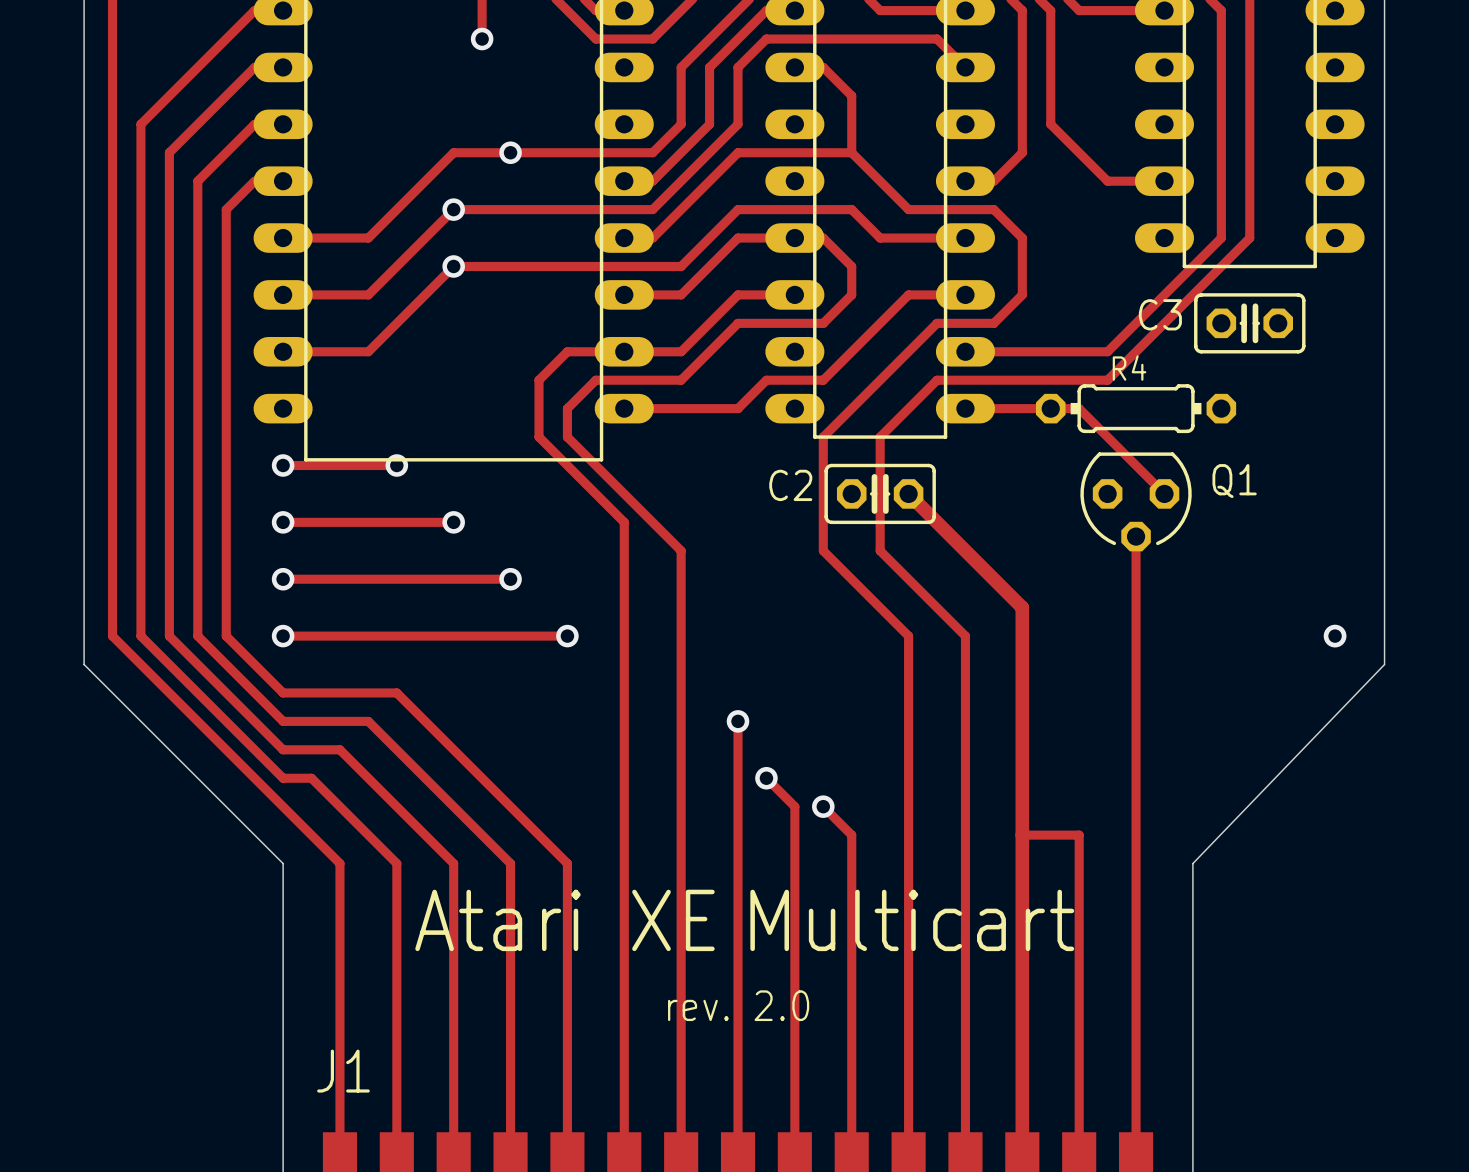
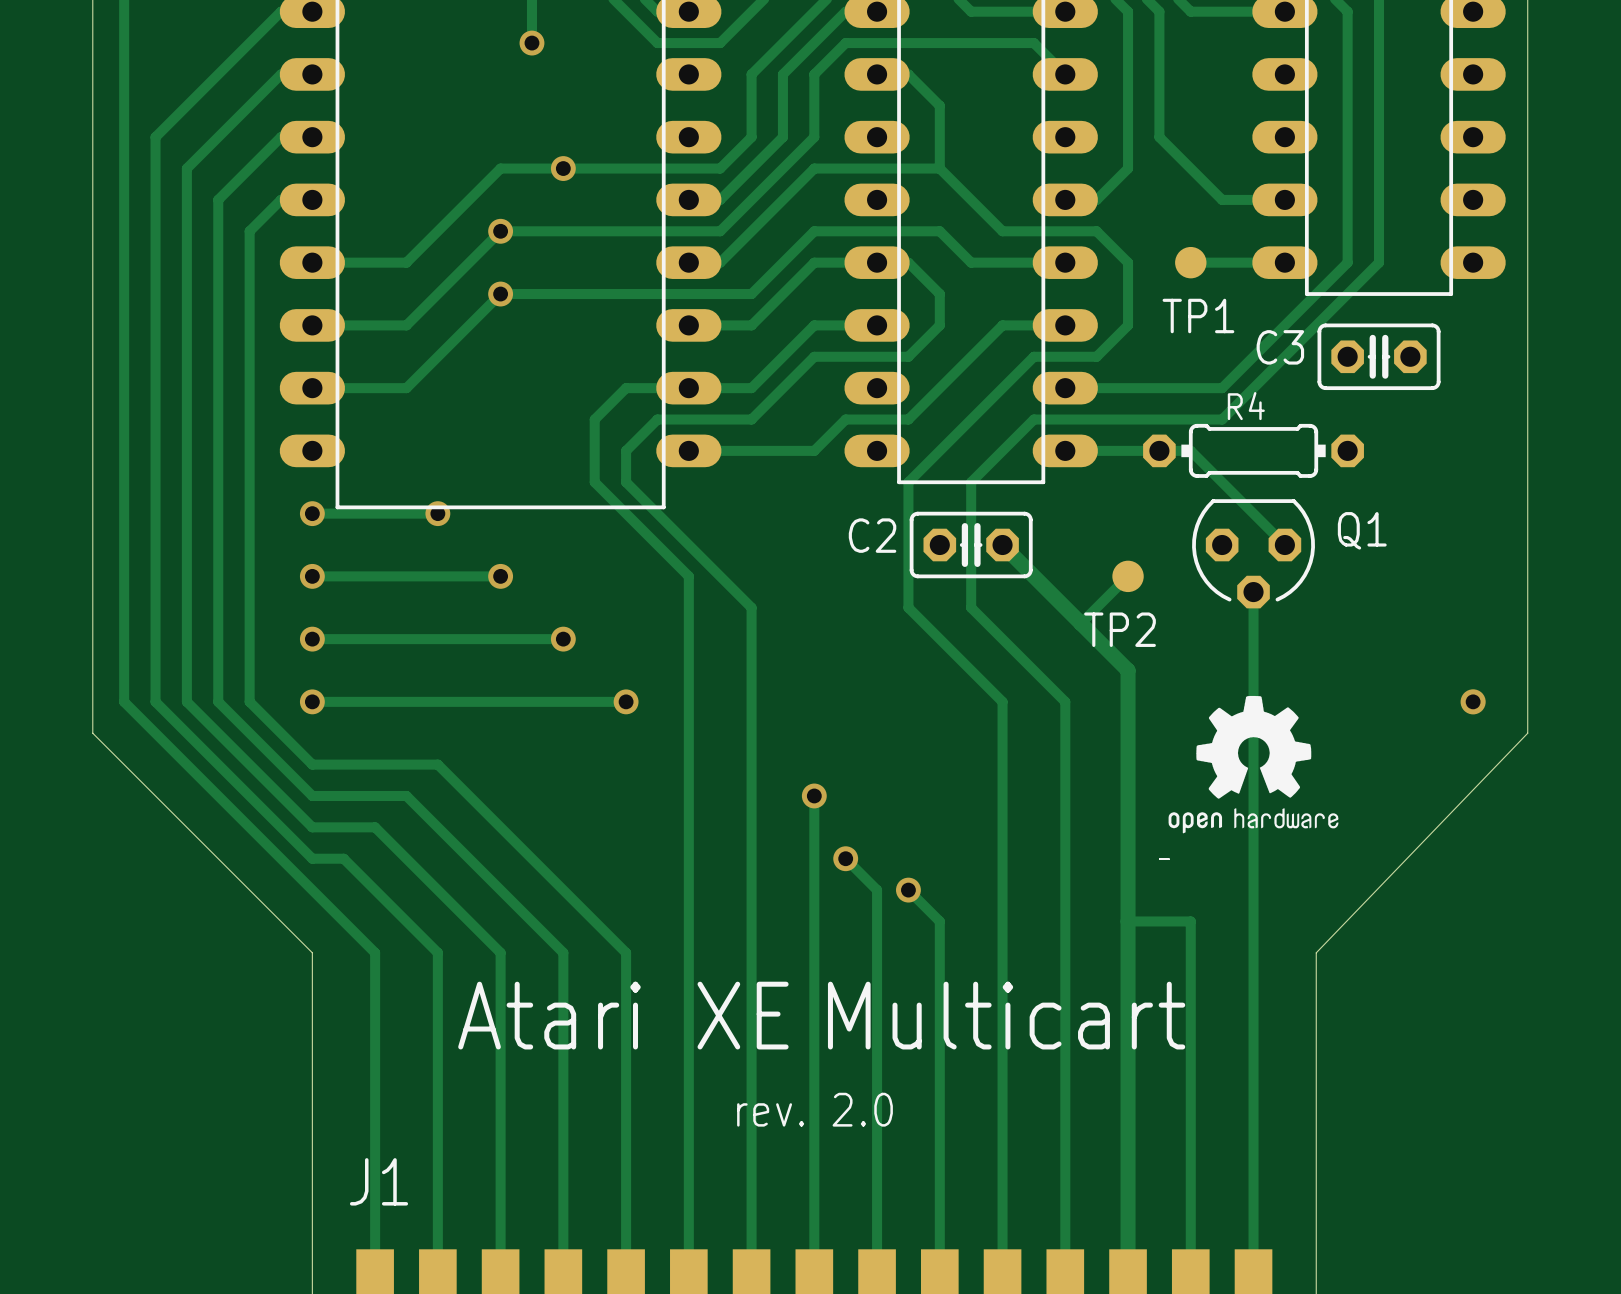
track: none -> (1190, 262) (1284, 262)
TP1: none -> (1190, 262)
track: none -> (1128, 576) (1080, 623)
TP2: none -> (1128, 576)
drawing: none -> [1168, 695, 1339, 834]

